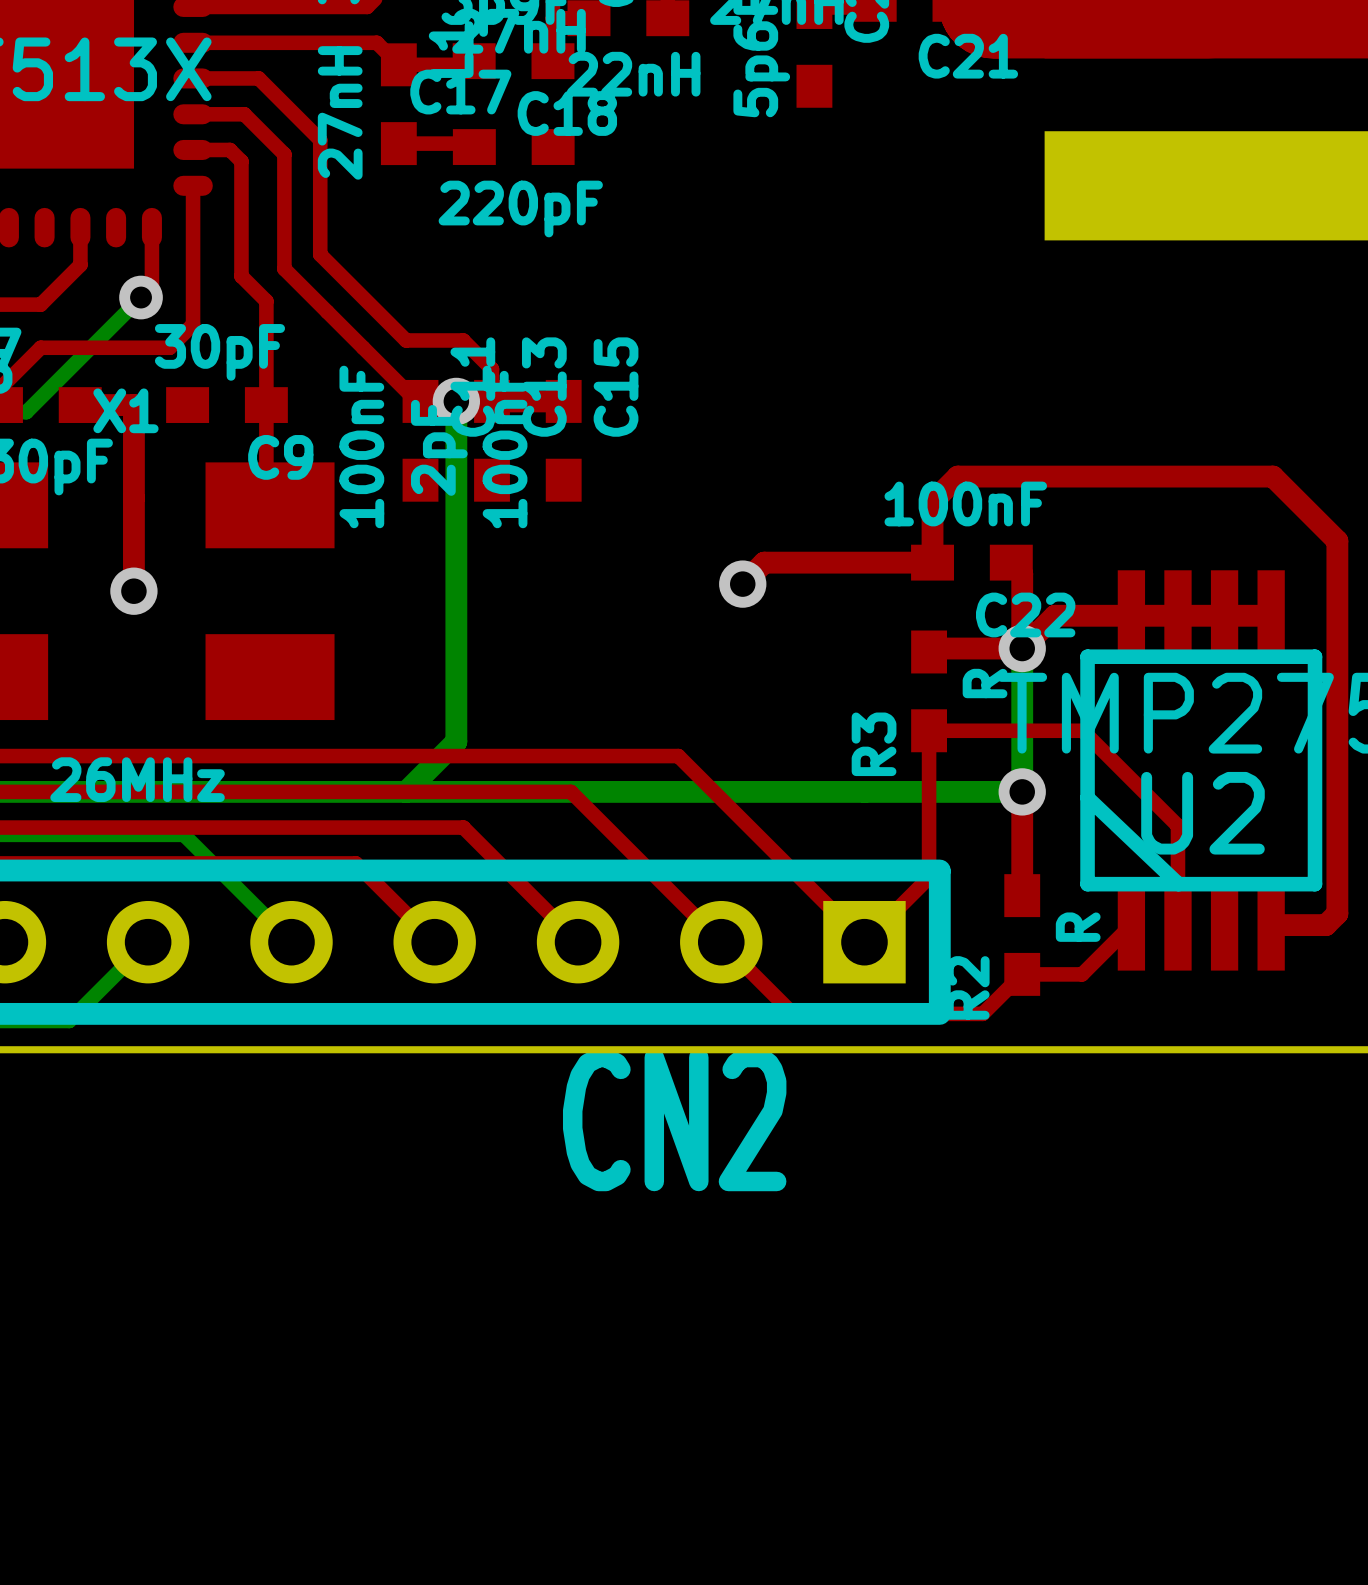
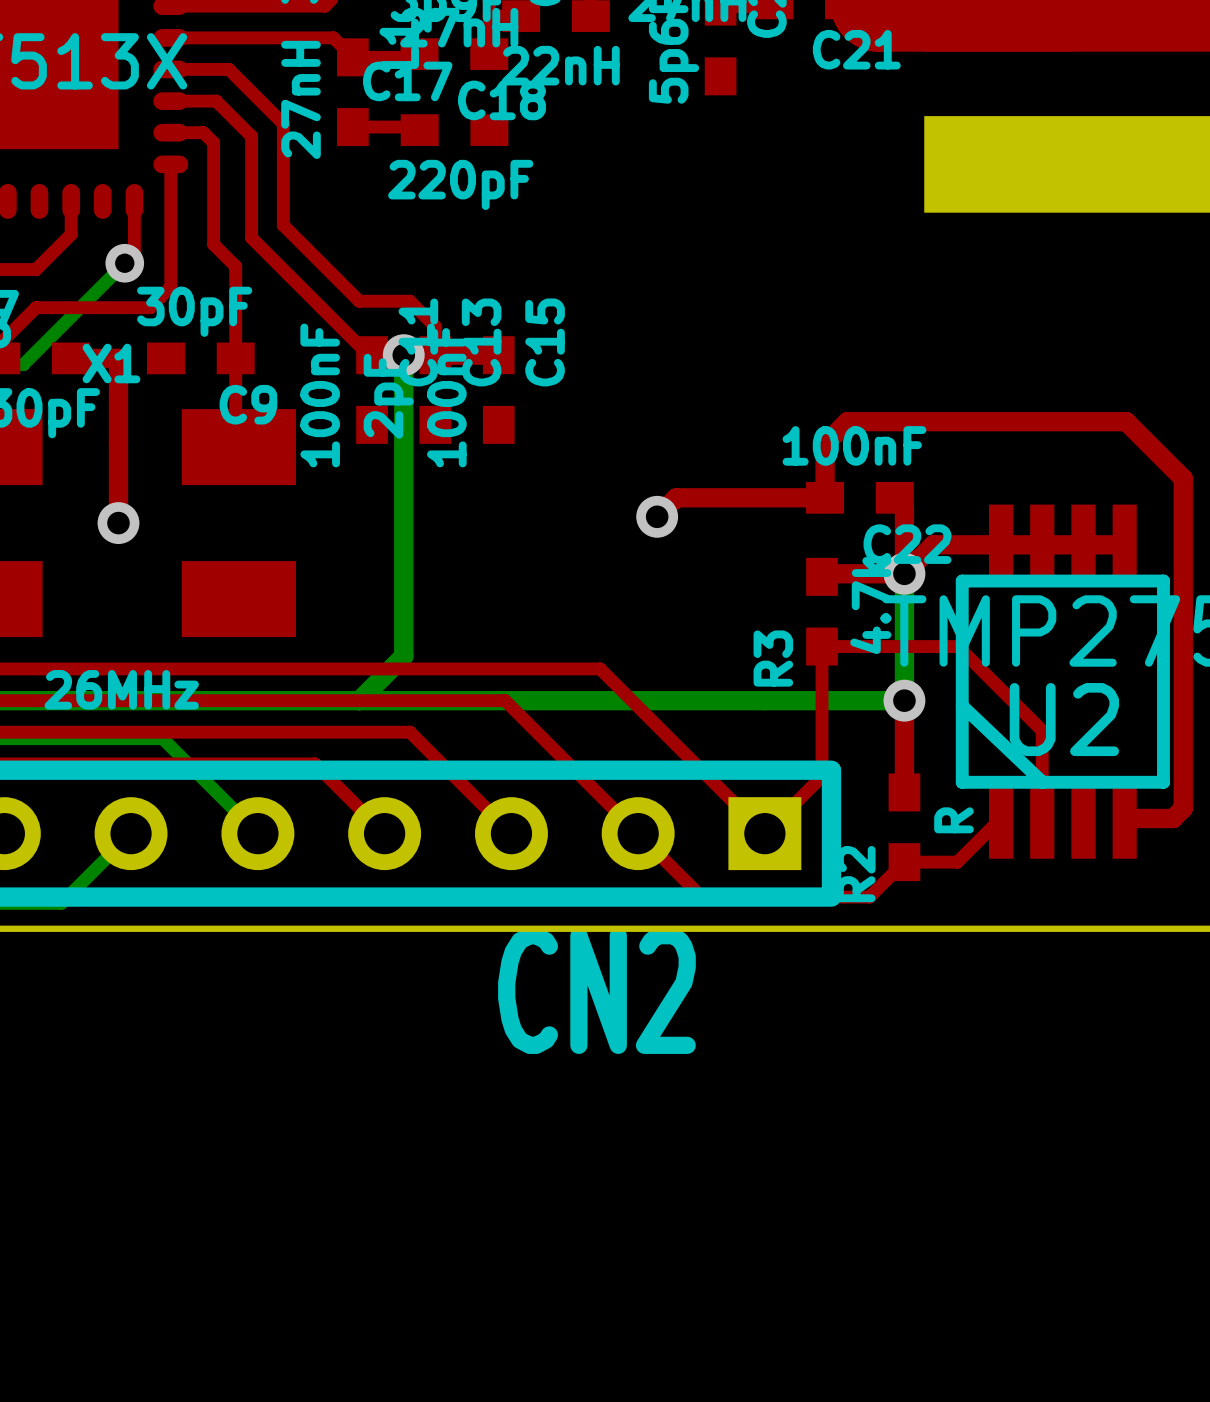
R3 value: R (985, 683) -> 4.7k (870, 605)

